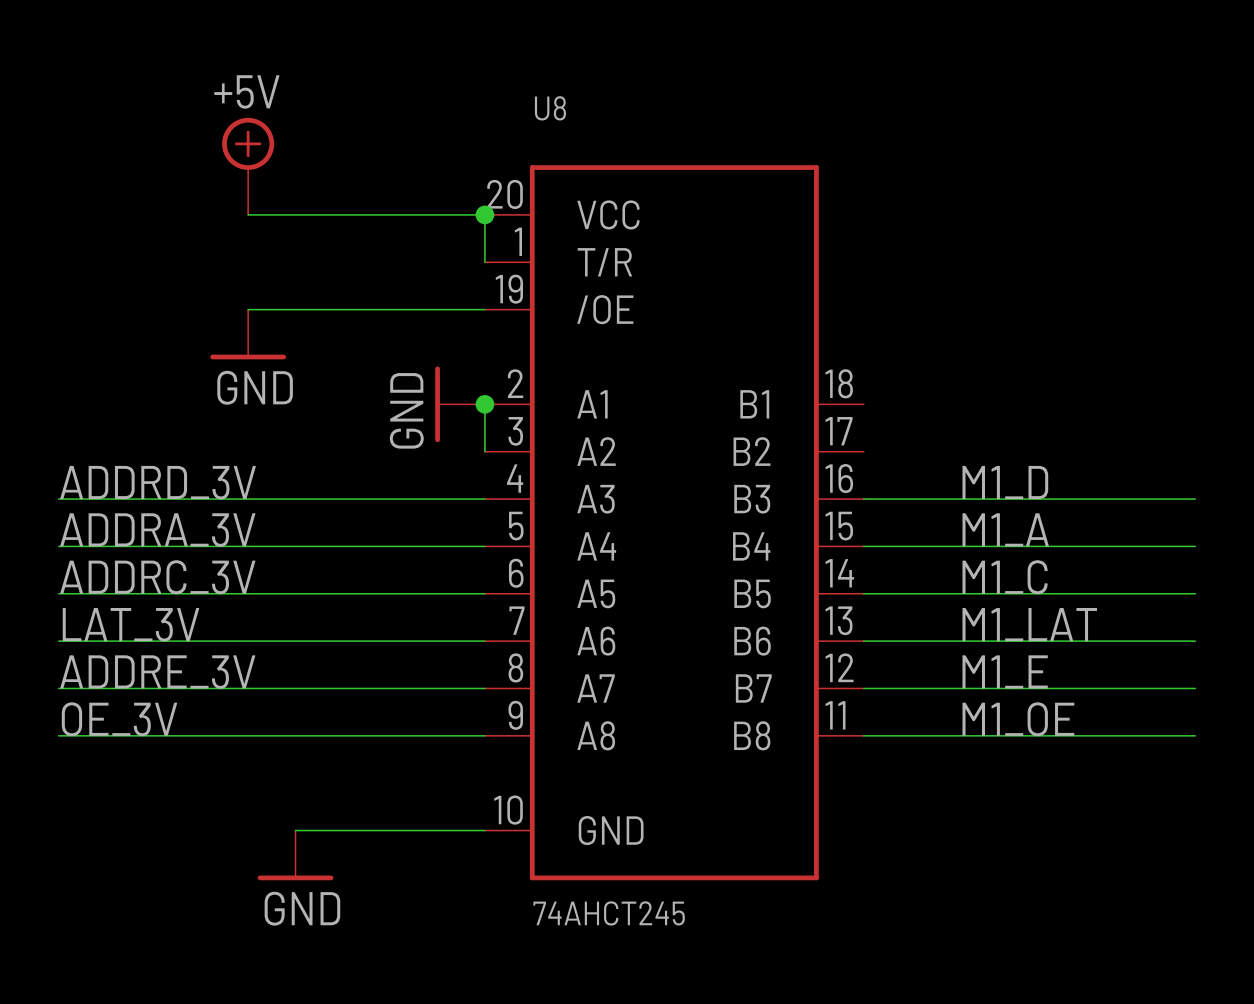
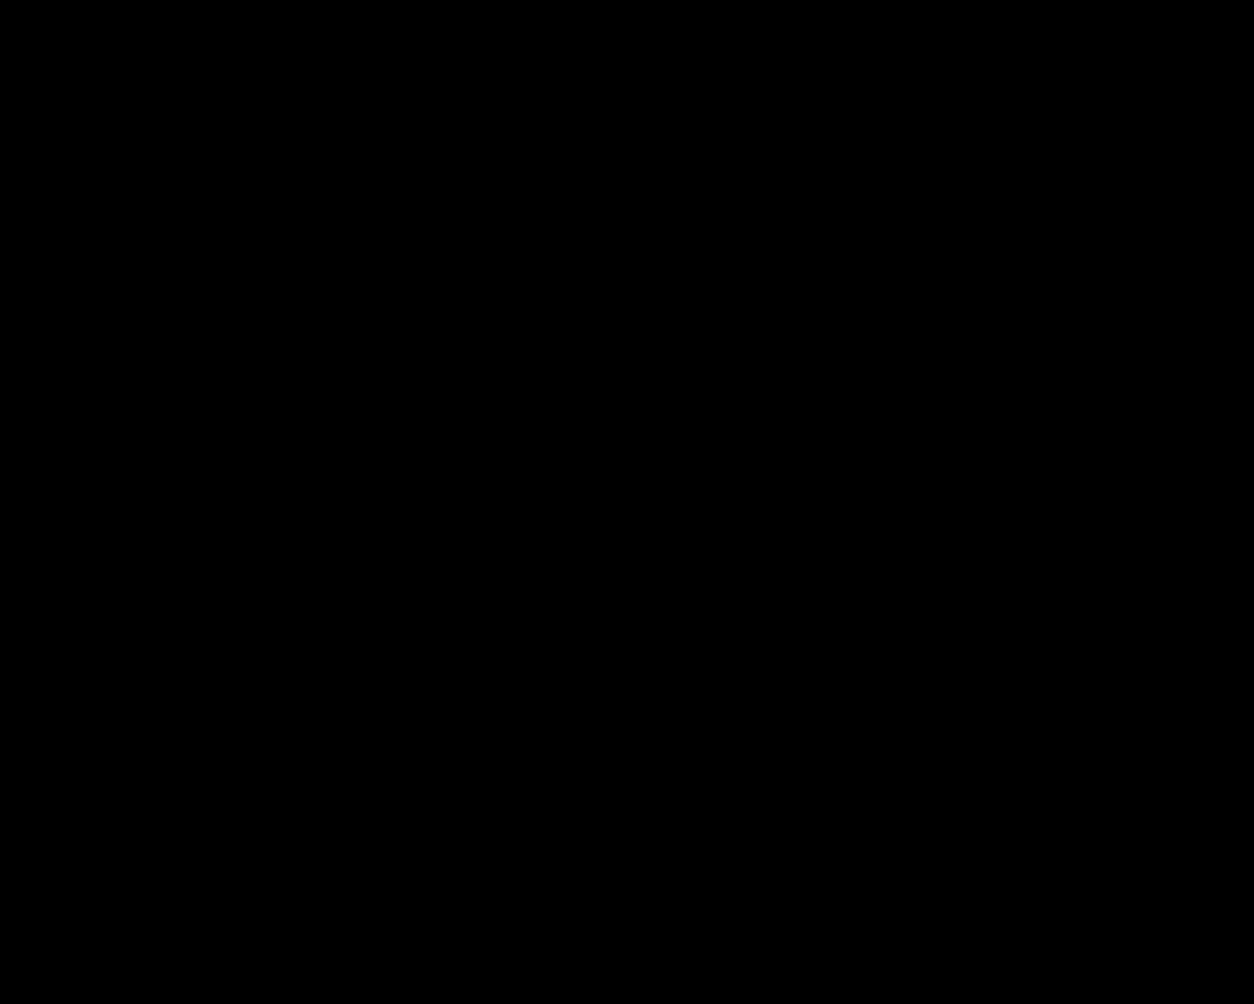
power symbol: +5V (248, 166) -> none
wire: (248, 214) (484, 214) (484, 262) -> none
junction: (484, 214) -> none
wire: (248, 309) (484, 309) -> none
power symbol: GND (248, 334) -> none
power symbol: GND (460, 404) -> none
wire: (484, 404) (484, 451) -> none
junction: (484, 404) -> none
label: ADDRD_3V (158, 482) -> none
label: M1_D (1005, 482) -> none
wire: (58, 499) (484, 499) -> none
wire: (863, 499) (1195, 499) -> none
U8: 74AHCT245 (674, 522) -> none
label: M1_A (1005, 529) -> none
label: ADDRA_3V (157, 530) -> none
wire: (58, 546) (484, 546) -> none
wire: (863, 546) (1195, 546) -> none
label: ADDRC_3V (157, 577) -> none
label: M1_C (1005, 577) -> none
wire: (58, 593) (484, 593) -> none
wire: (863, 593) (1195, 593) -> none
label: LAT_3V (131, 624) -> none
label: M1_LAT (1029, 624) -> none
wire: (58, 641) (484, 641) -> none
wire: (863, 641) (1195, 641) -> none
label: M1_E (1005, 671) -> none
label: ADDRE_3V (157, 672) -> none
wire: (58, 688) (484, 688) -> none
wire: (863, 688) (1195, 688) -> none
label: OE_3V (119, 719) -> none
label: M1_OE (1018, 719) -> none
wire: (58, 735) (484, 735) -> none
wire: (863, 735) (1195, 735) -> none
wire: (295, 830) (484, 830) -> none
power symbol: GND (295, 855) -> none

